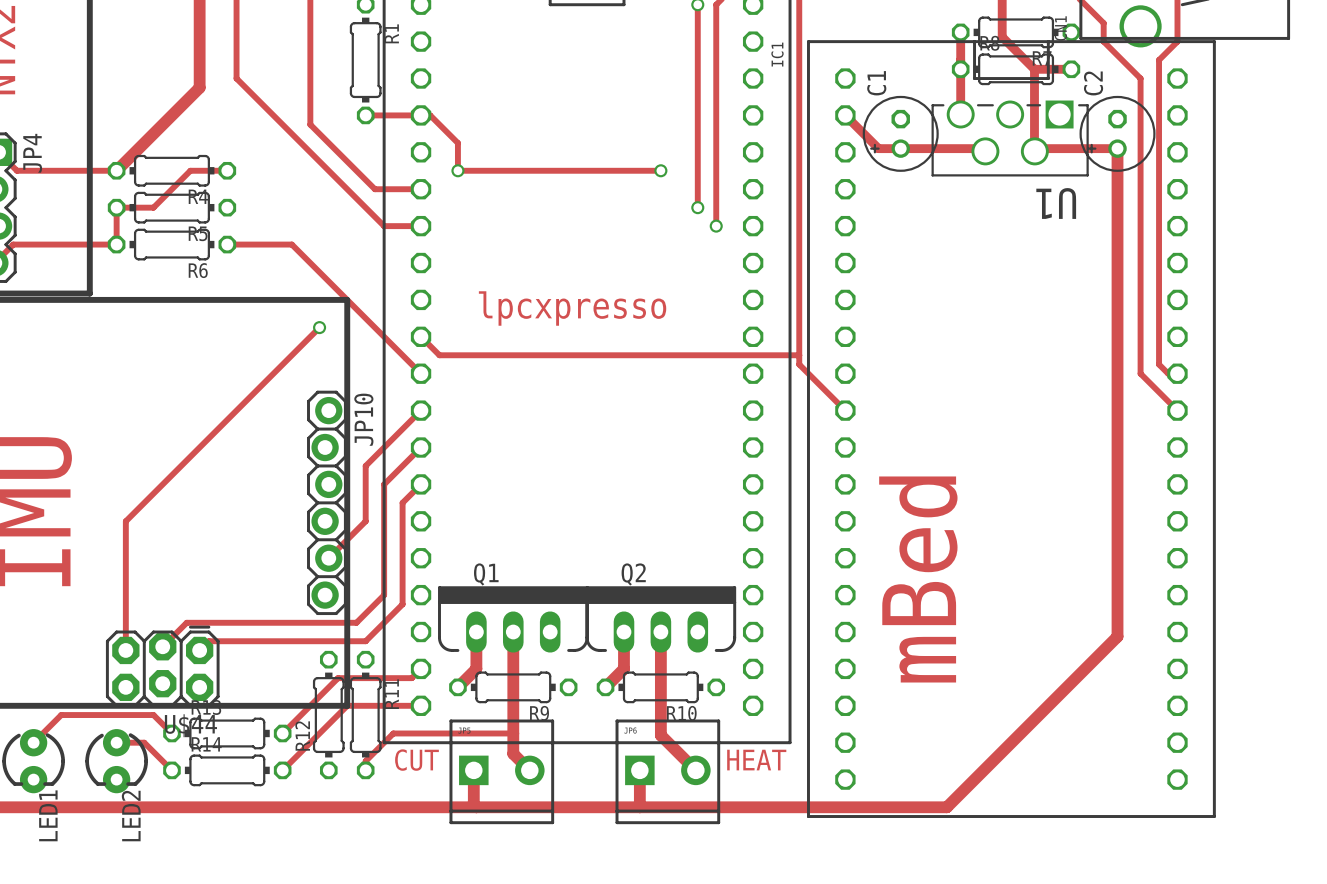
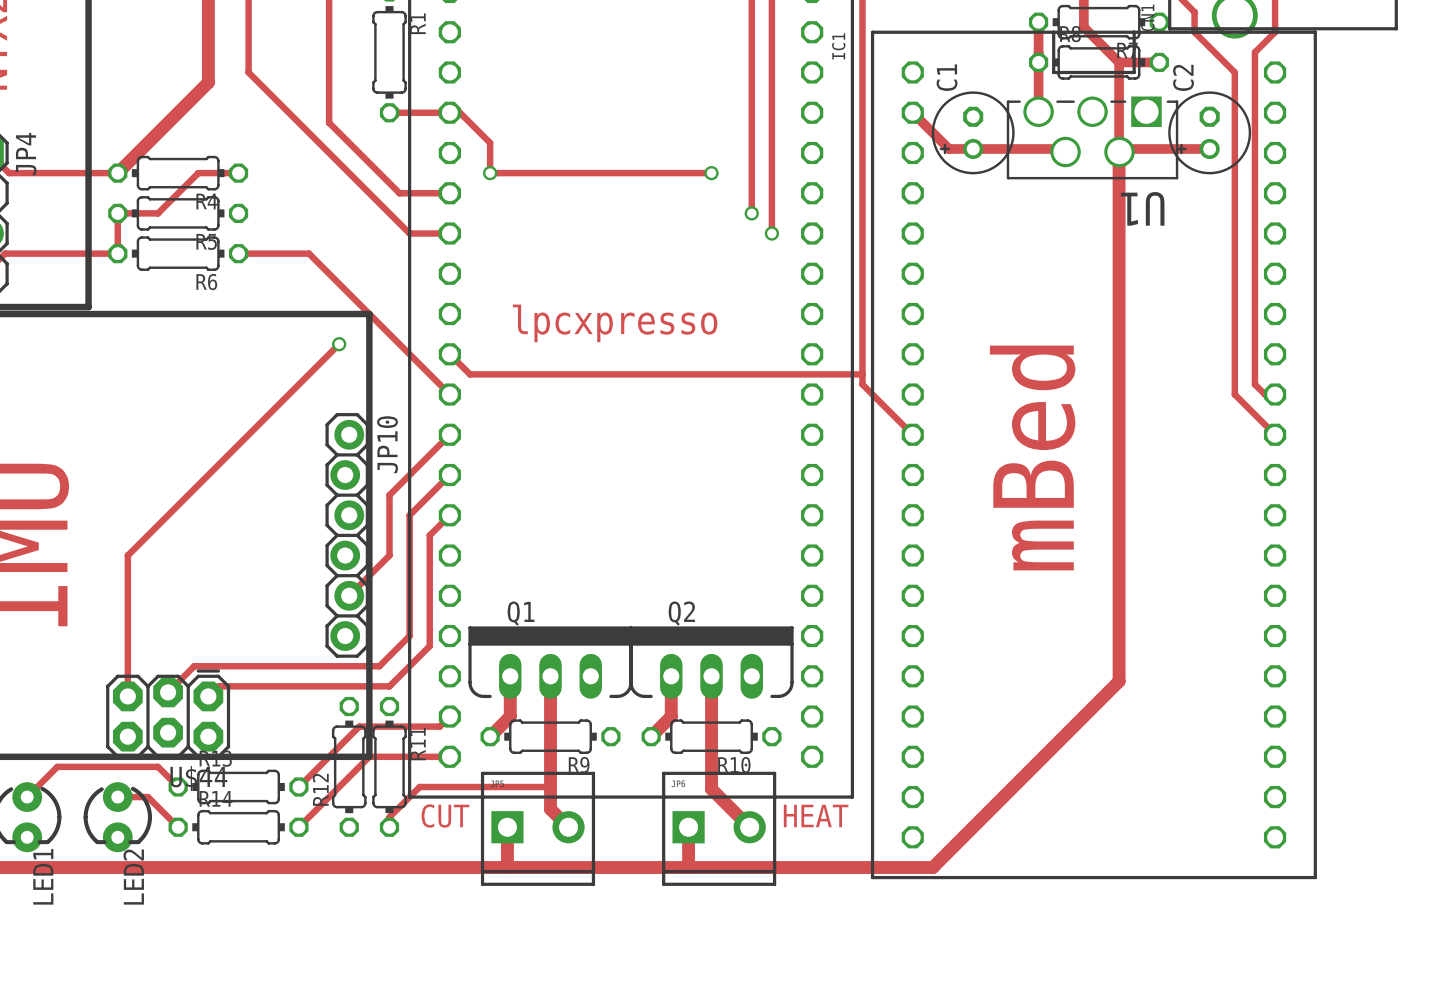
track: (1117, 148) (1117, 636) (946, 807) (863, 807) -> (1119, 151) (1119, 681) (932, 867)
text position: mBed (918, 579) -> mBed (1032, 457)

